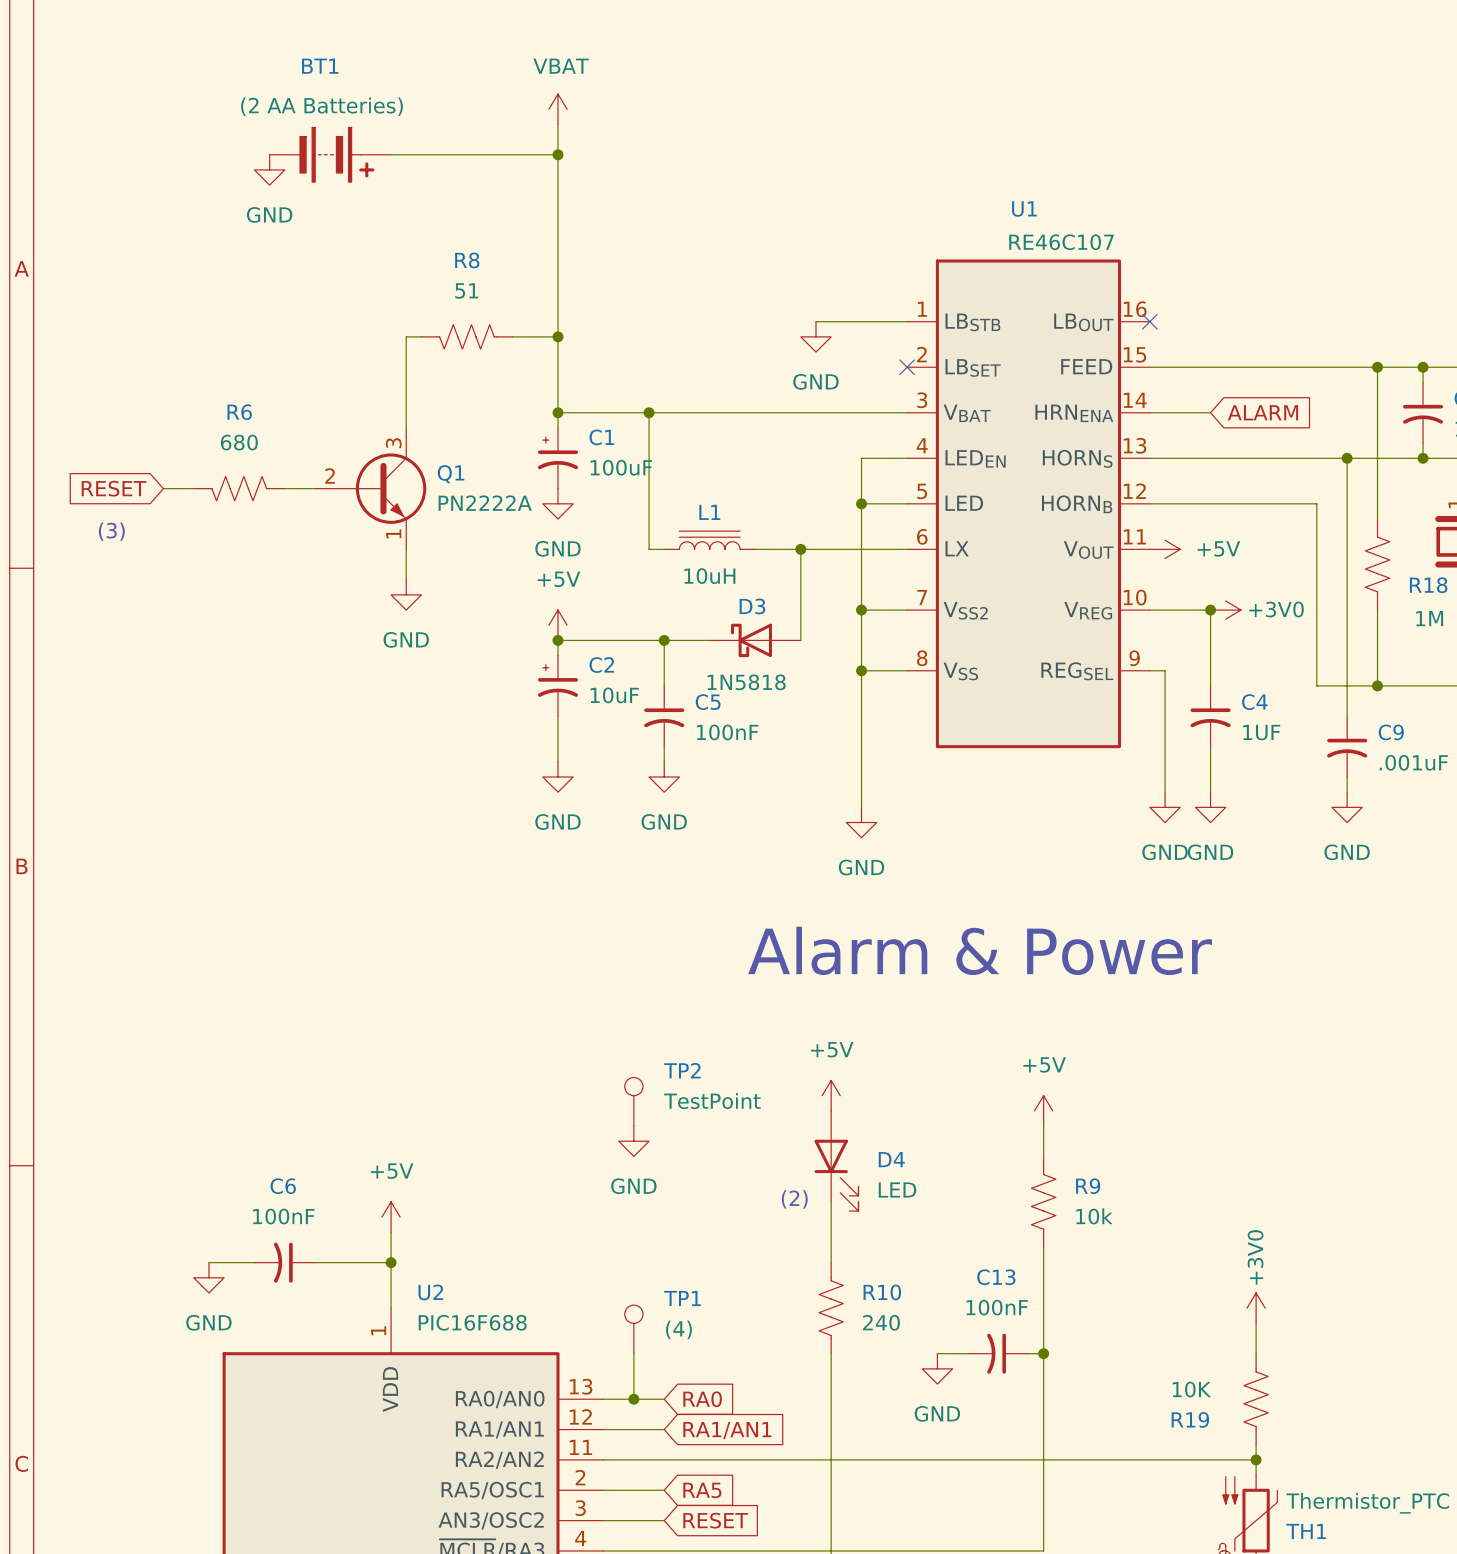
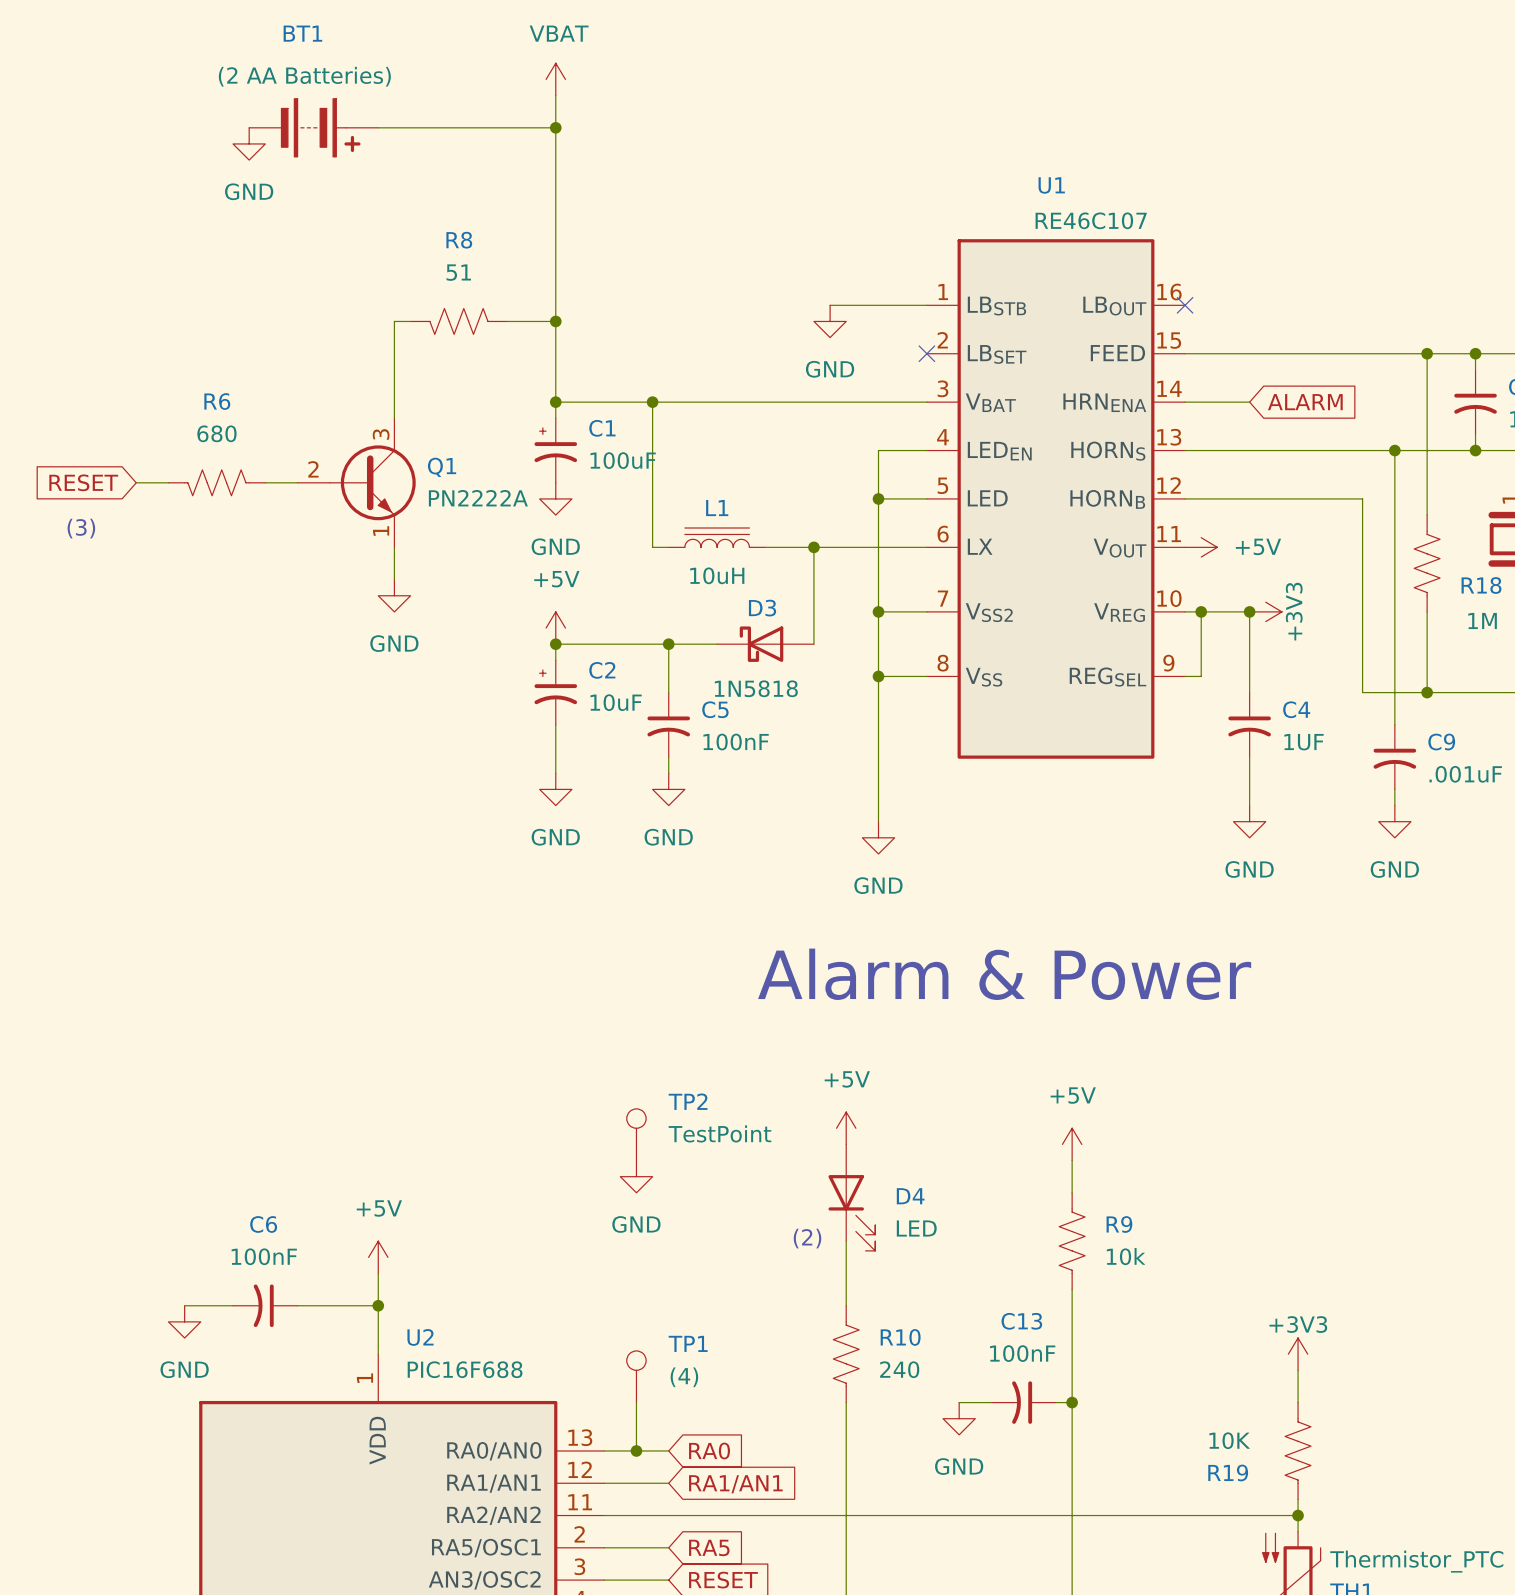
junction: none -> (1201, 611)
power symbol: +3V0 (1225, 610) -> +3V3 (1265, 611)
wire: (1165, 670) (1165, 792) -> (1201, 676) (1201, 611)
power symbol: GND (1165, 807) -> none
power symbol: +3V0 (1256, 1308) -> +3V3 (1298, 1354)

